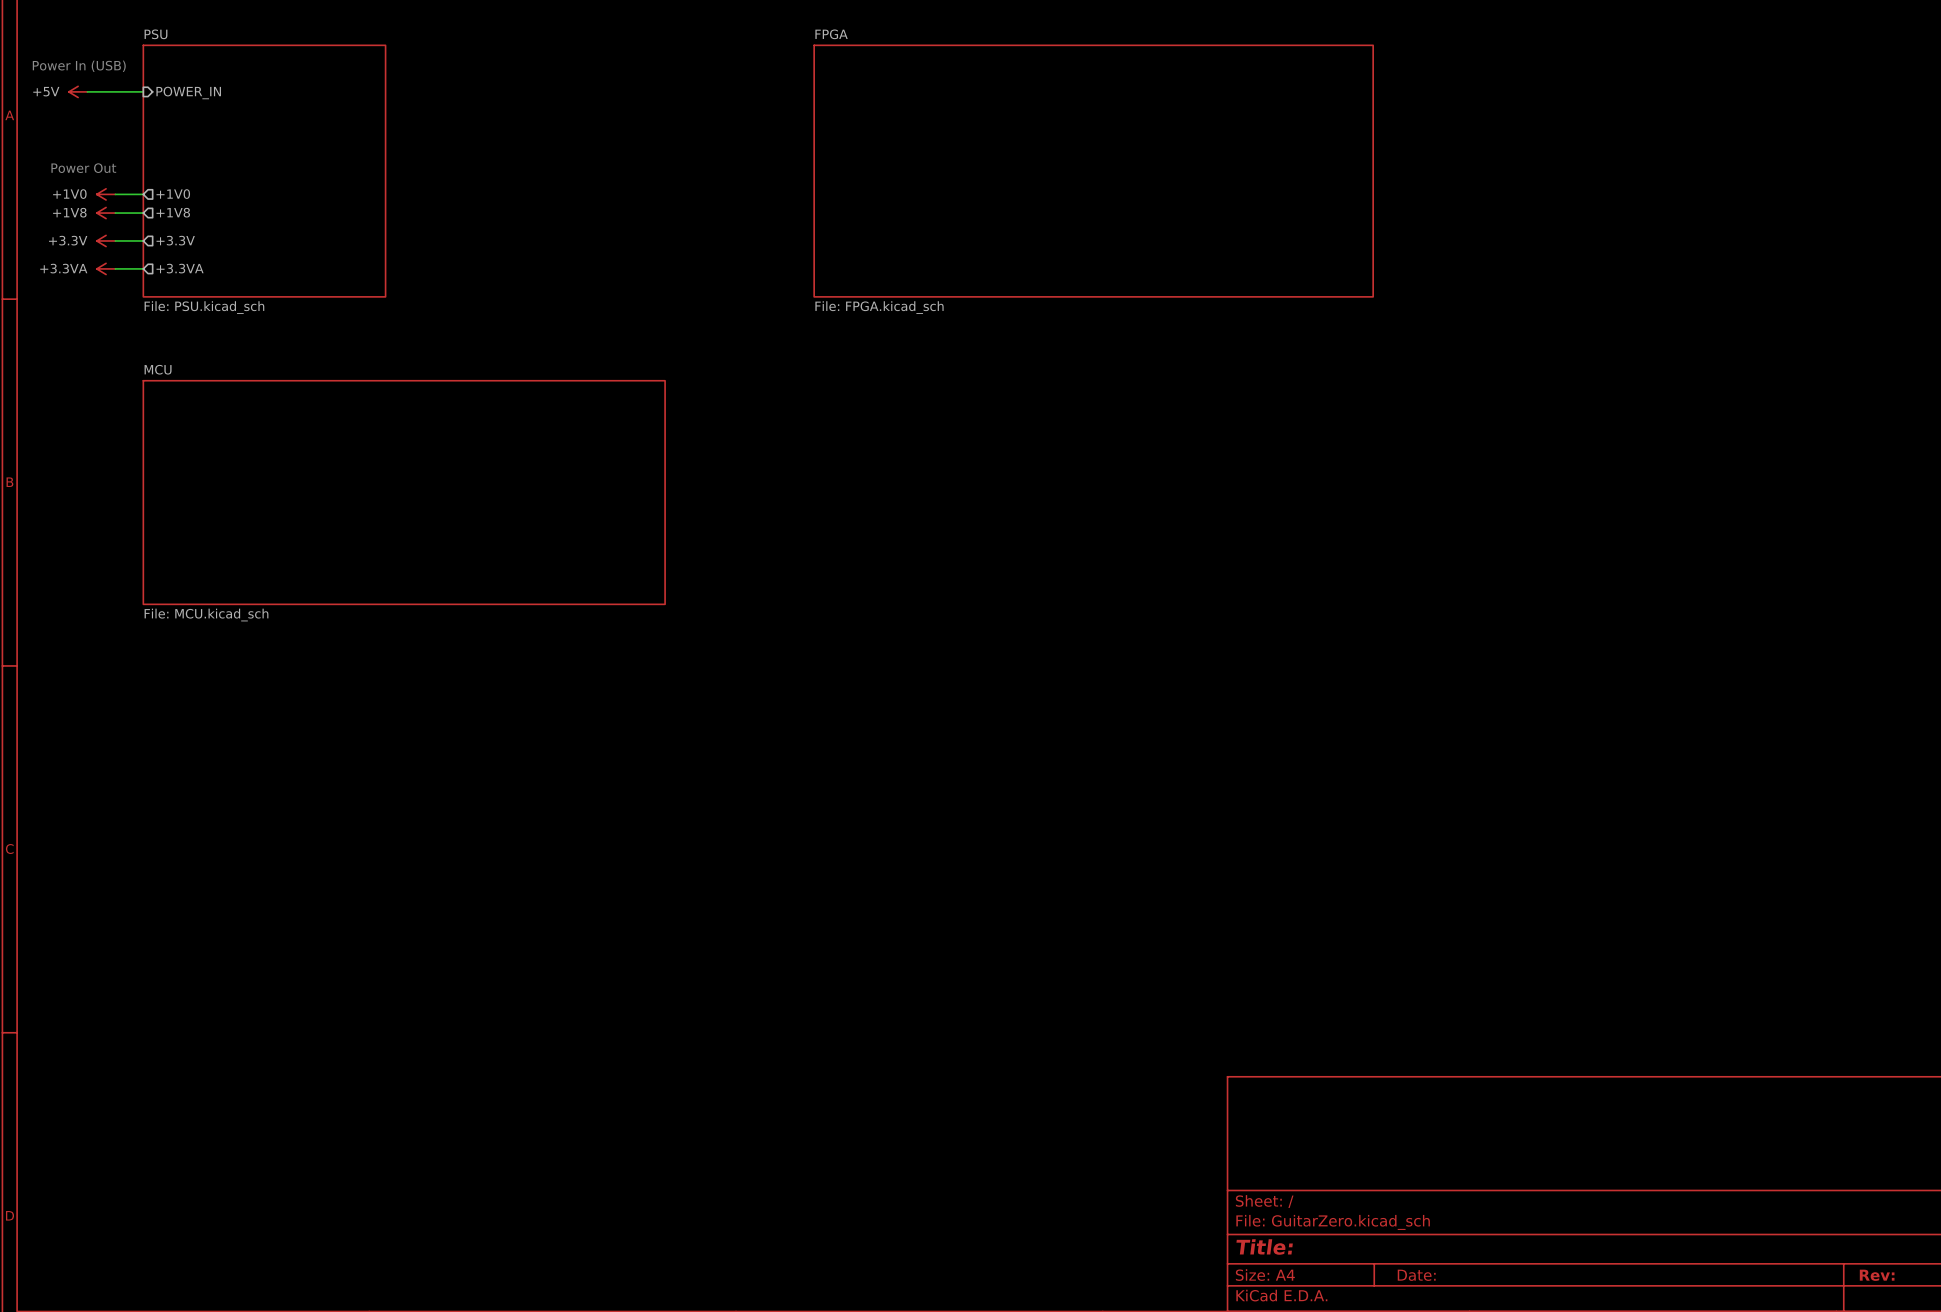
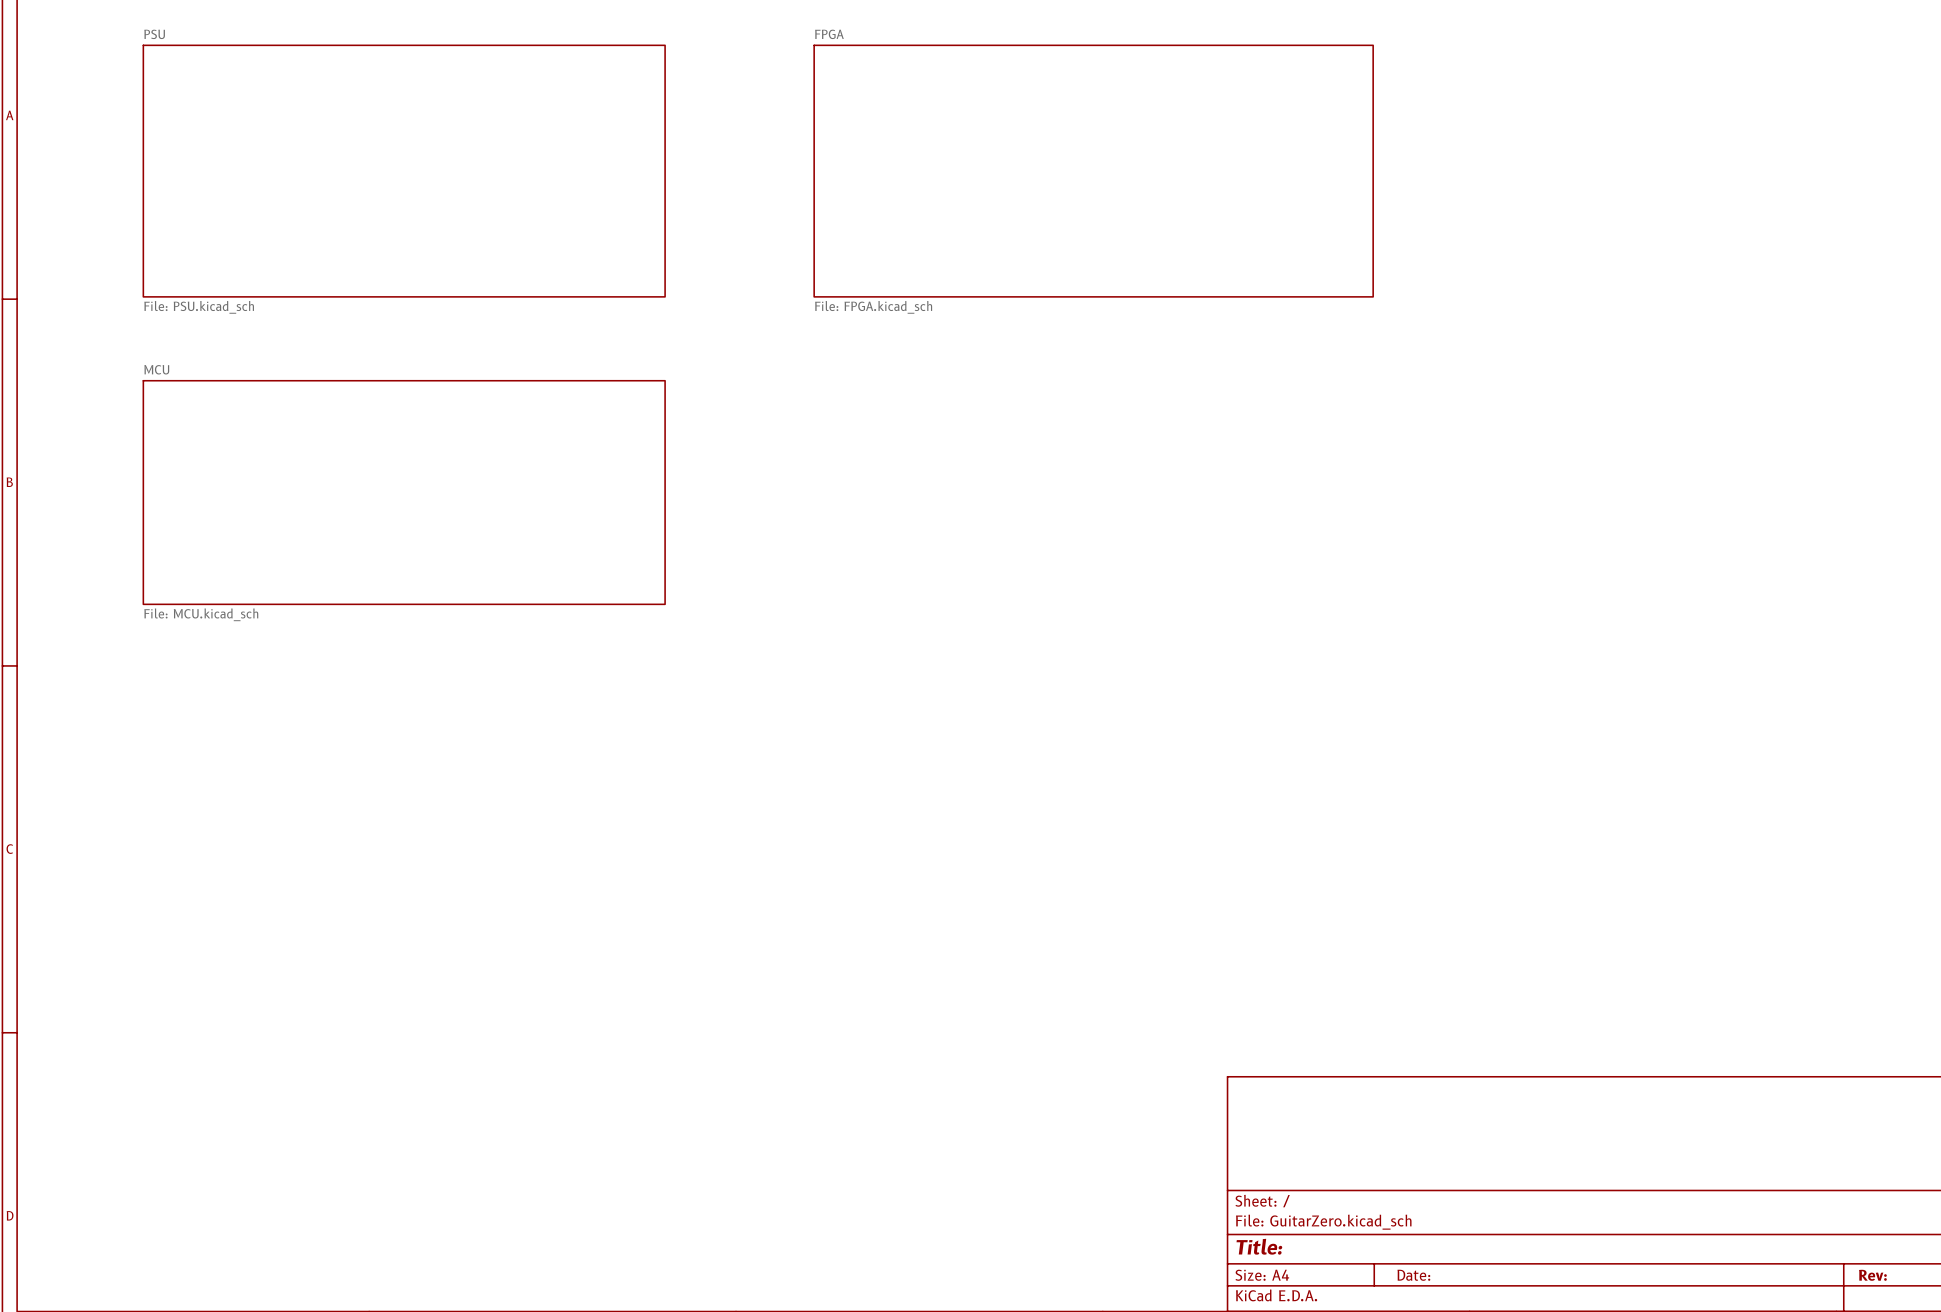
text: Power In (USB) (79, 66) -> none
power symbol: +5V (78, 91) -> none
wire: (87, 91) (143, 91) -> none
sheet pin: POWER_IN (188, 92) -> none
text: Power Out (83, 168) -> none
sheet PSU: File: PSU.kicad_sch (264, 171) -> none
sheet PSU: none -> File: PSU.kicad_sch (404, 171)
power symbol: +1V0 (106, 194) -> none
wire: (115, 194) (143, 194) -> none
sheet pin: +1V0 (173, 194) -> none
sheet pin: +1V8 (173, 212) -> none
power symbol: +1V8 (106, 213) -> none
wire: (115, 213) (143, 213) -> none
power symbol: +3.3V (106, 240) -> none
wire: (115, 240) (143, 240) -> none
sheet pin: +3.3V (175, 240) -> none
power symbol: +3.3VA (106, 268) -> none
wire: (115, 268) (143, 268) -> none
sheet pin: +3.3VA (180, 268) -> none

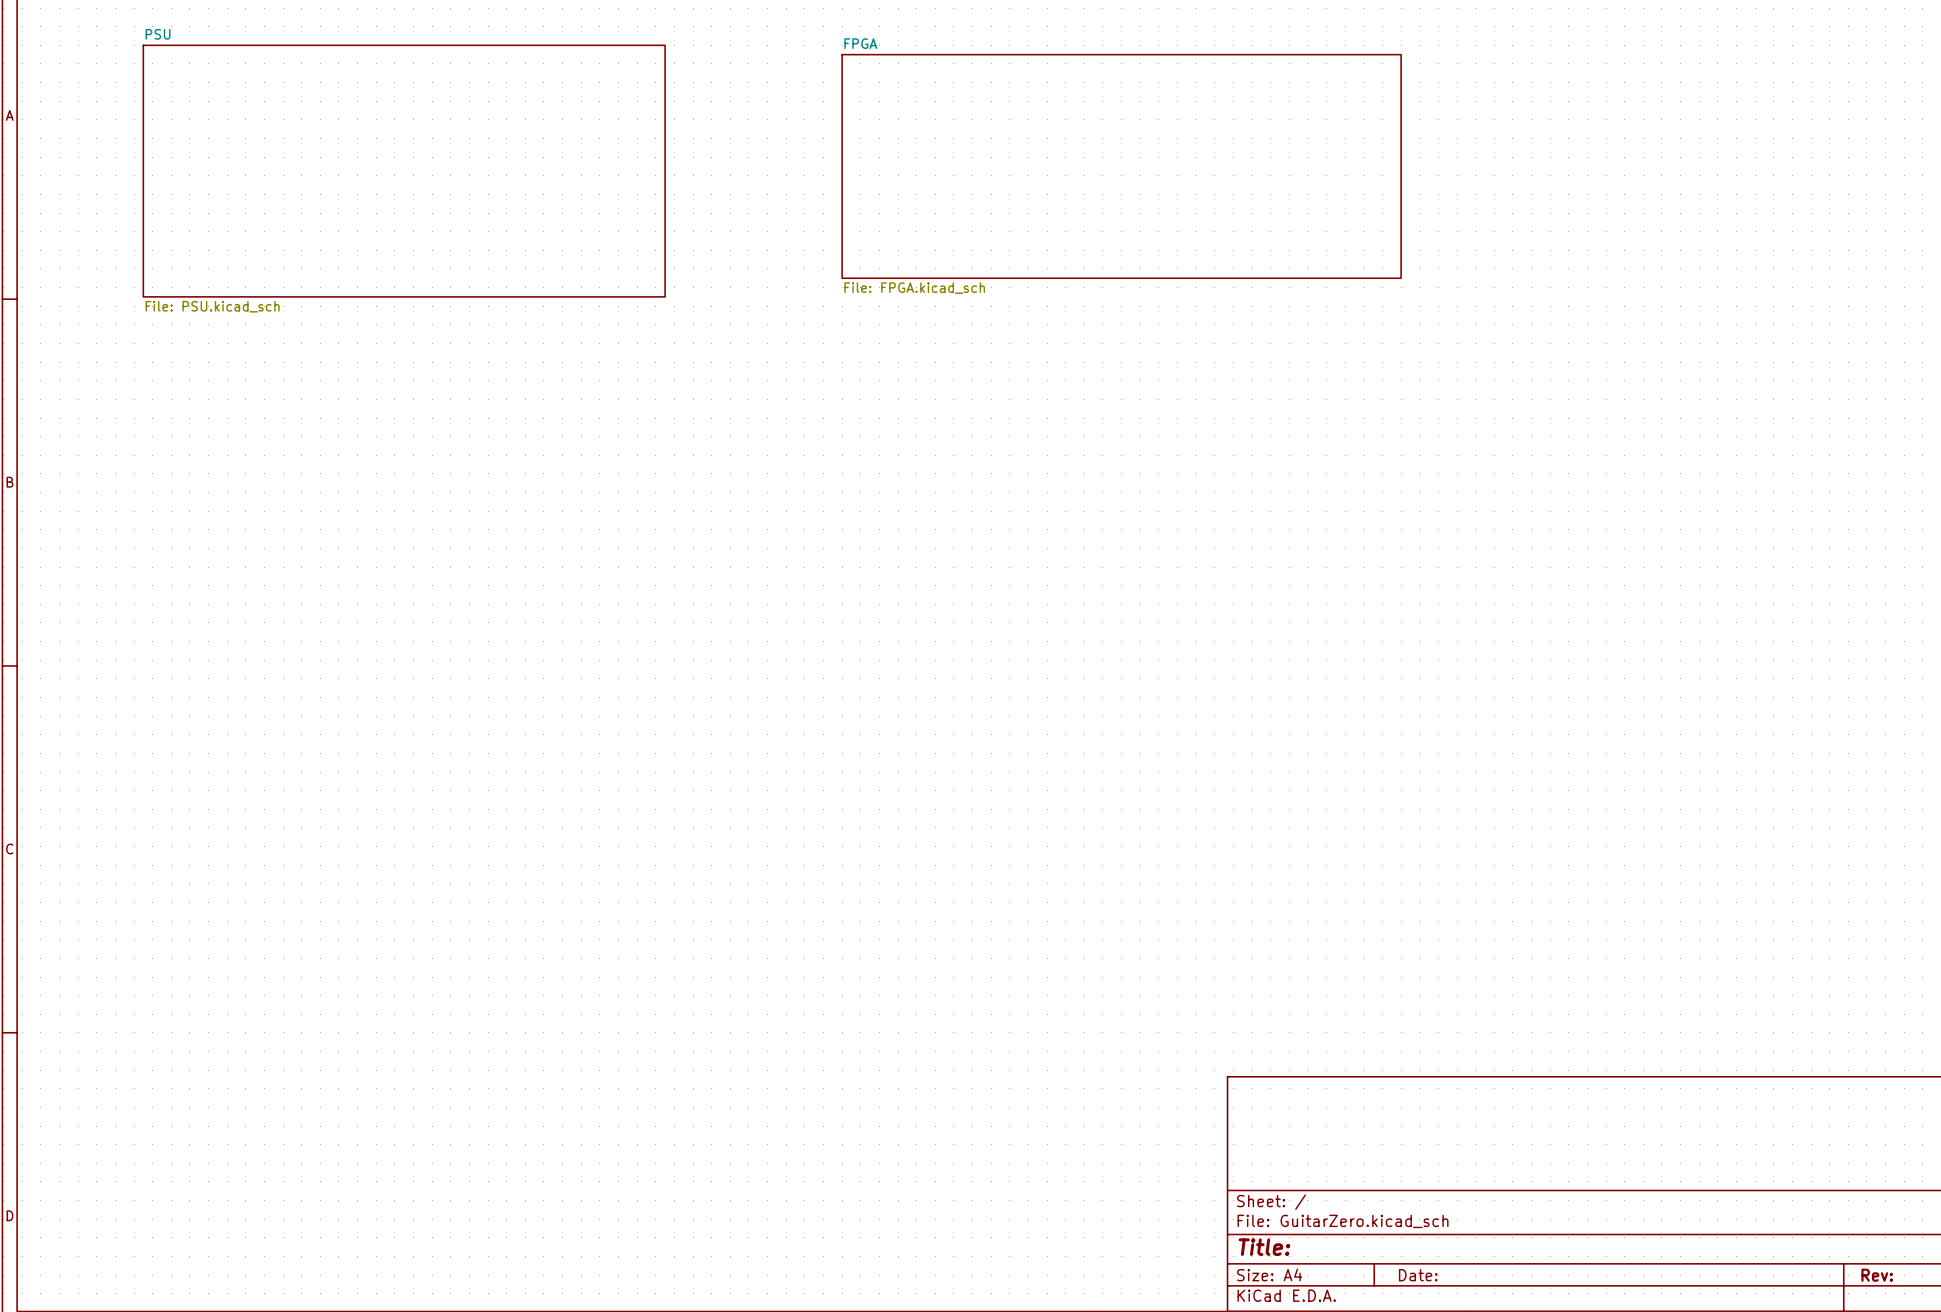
sheet FPGA: none -> File: FPGA.kicad_sch (1121, 166)
sheet FPGA: File: FPGA.kicad_sch (1093, 171) -> none
sheet MCU: File: MCU.kicad_sch (404, 492) -> none

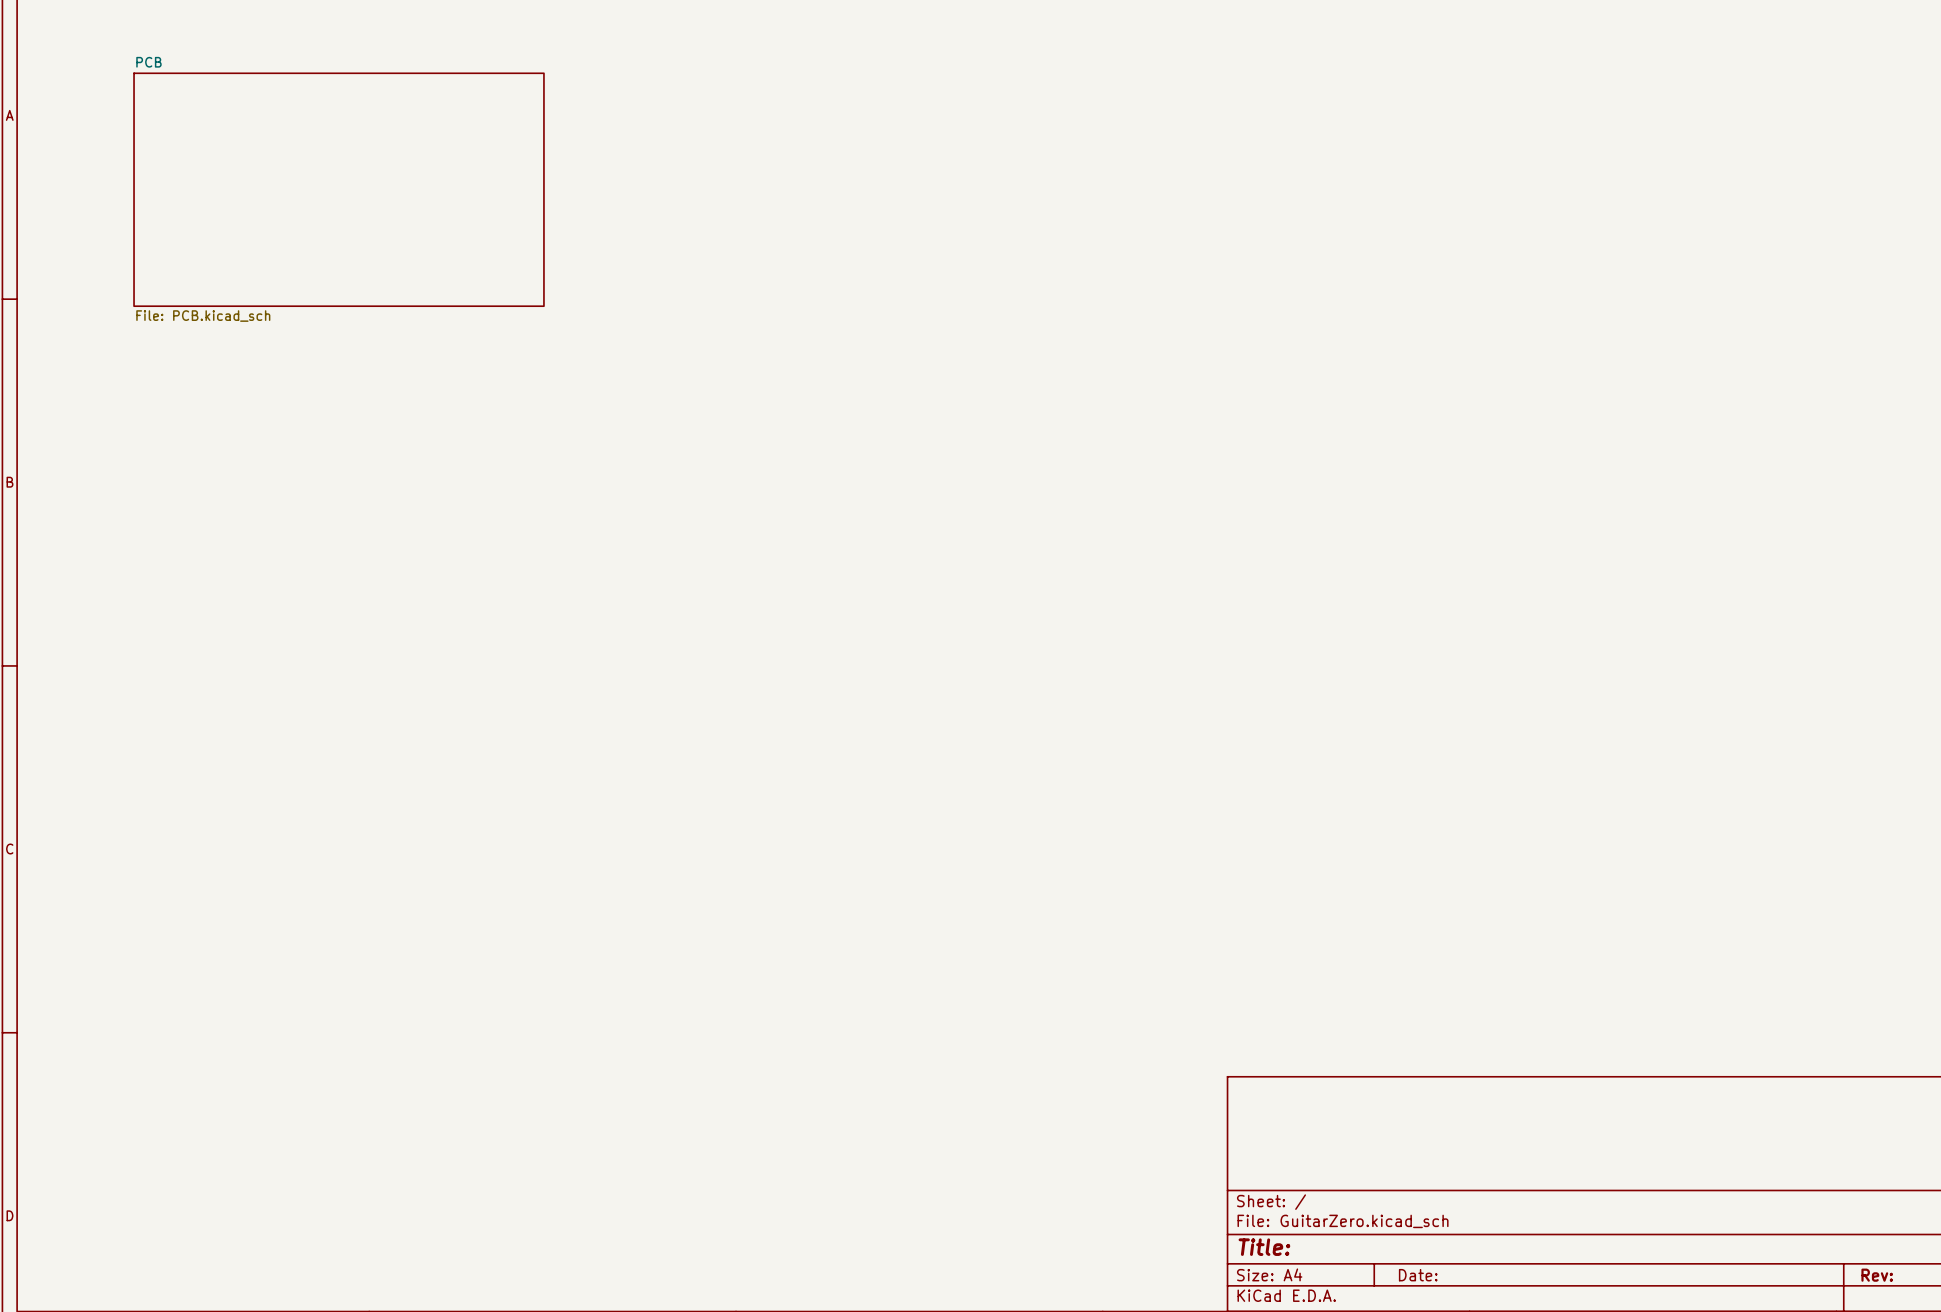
sheet FPGA: File: FPGA.kicad_sch (1121, 166) -> none
sheet PSU: File: PSU.kicad_sch (404, 171) -> none
sheet PCB: none -> File: PCB.kicad_sch (338, 189)

